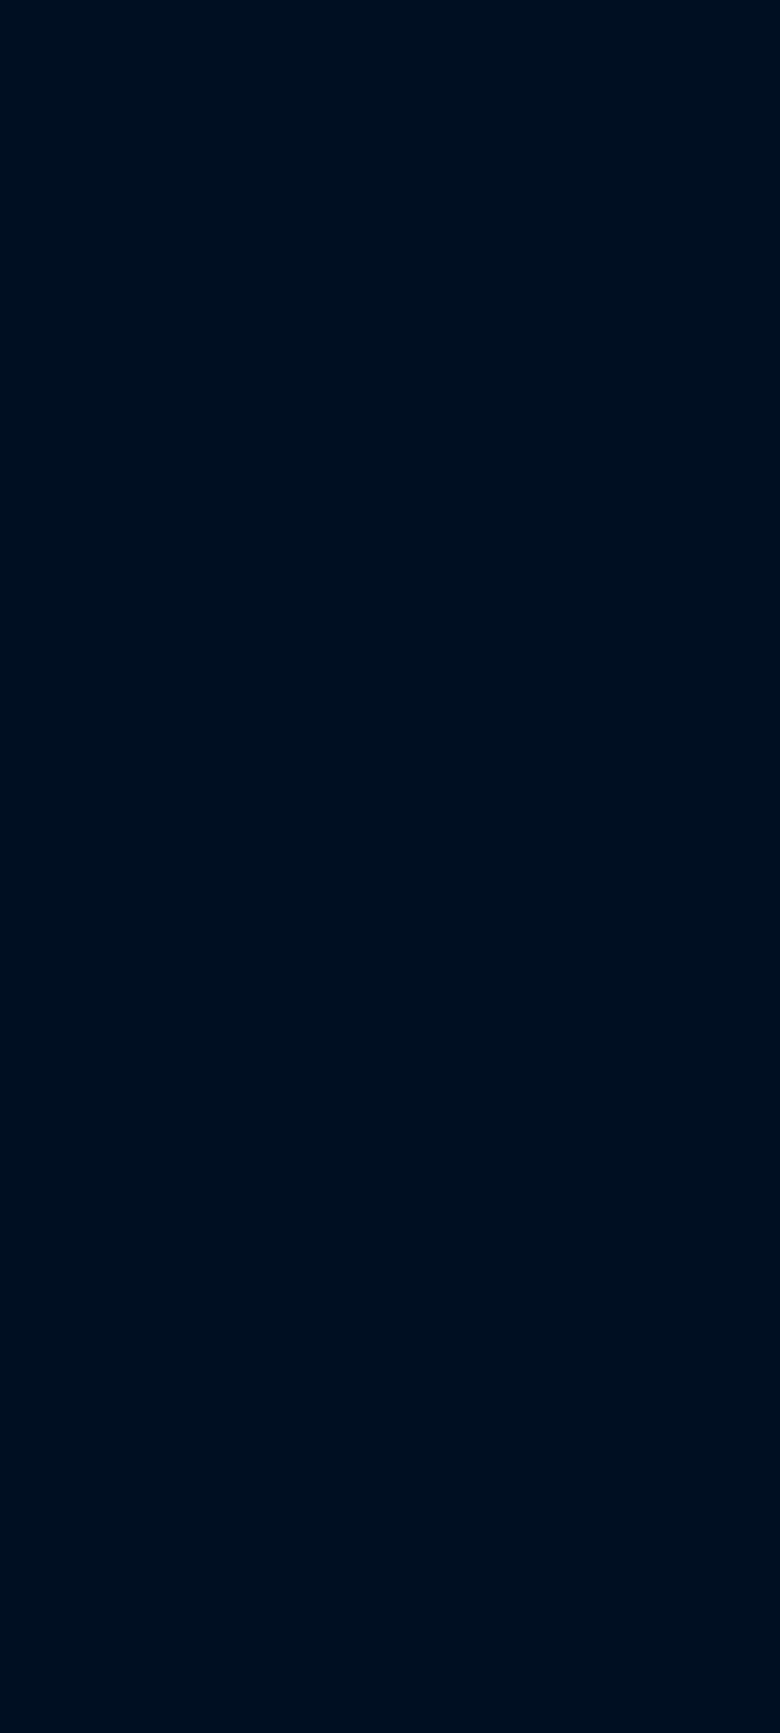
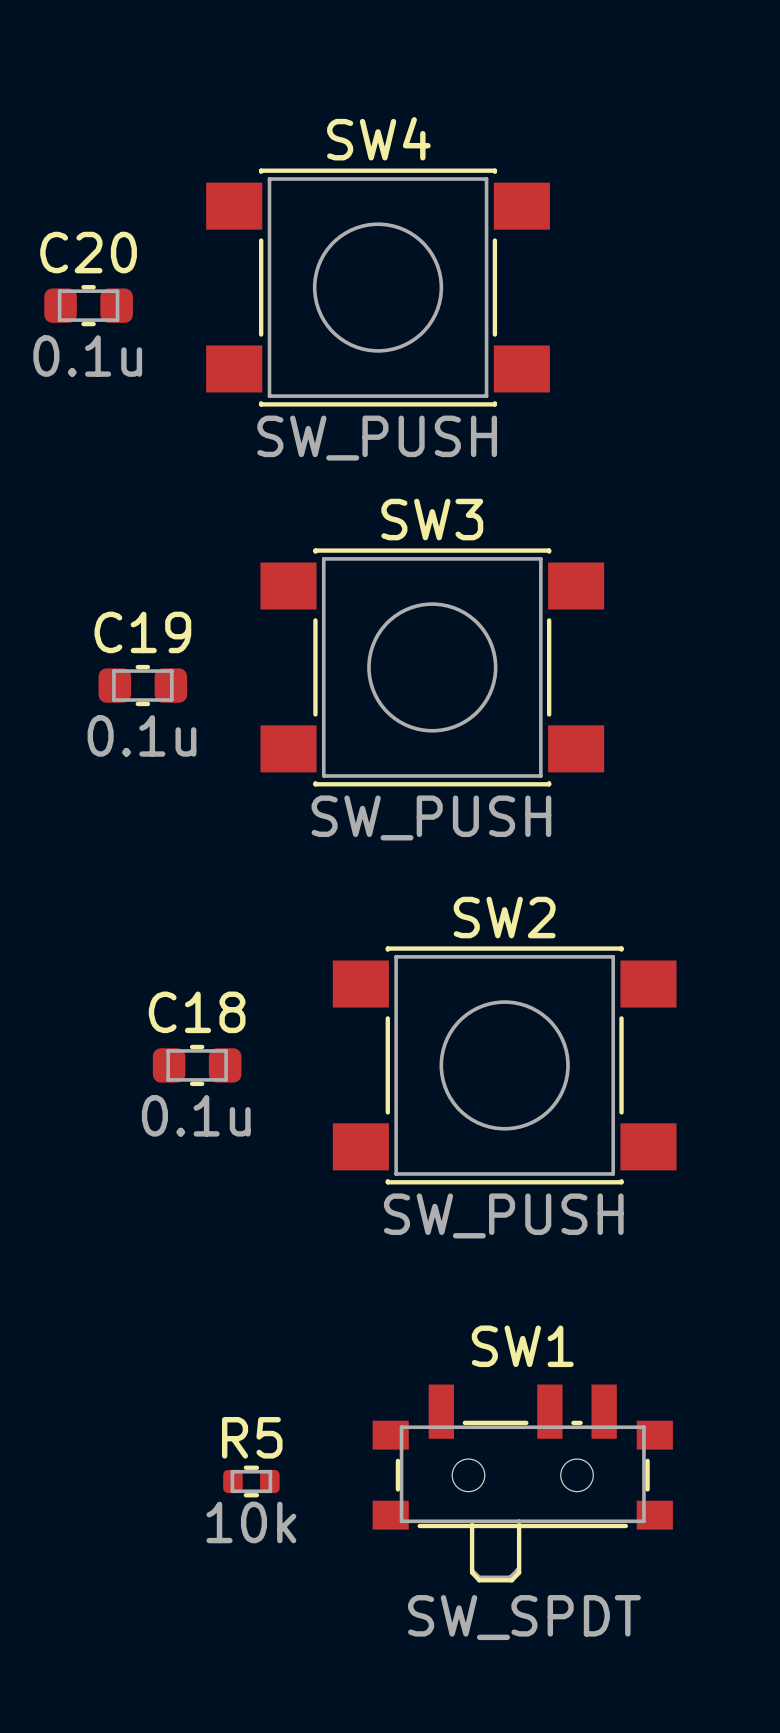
SW4: none -> SW_PUSH (378, 287)
C20: none -> 0.1u (88, 305)
SW3: none -> SW_PUSH (432, 667)
C19: none -> 0.1u (142, 685)
C18: none -> 0.1u (197, 1065)
SW2: none -> SW_PUSH (504, 1065)
R5: none -> 10k (251, 1481)
SW1: none -> SW_SPDT (522, 1483)

